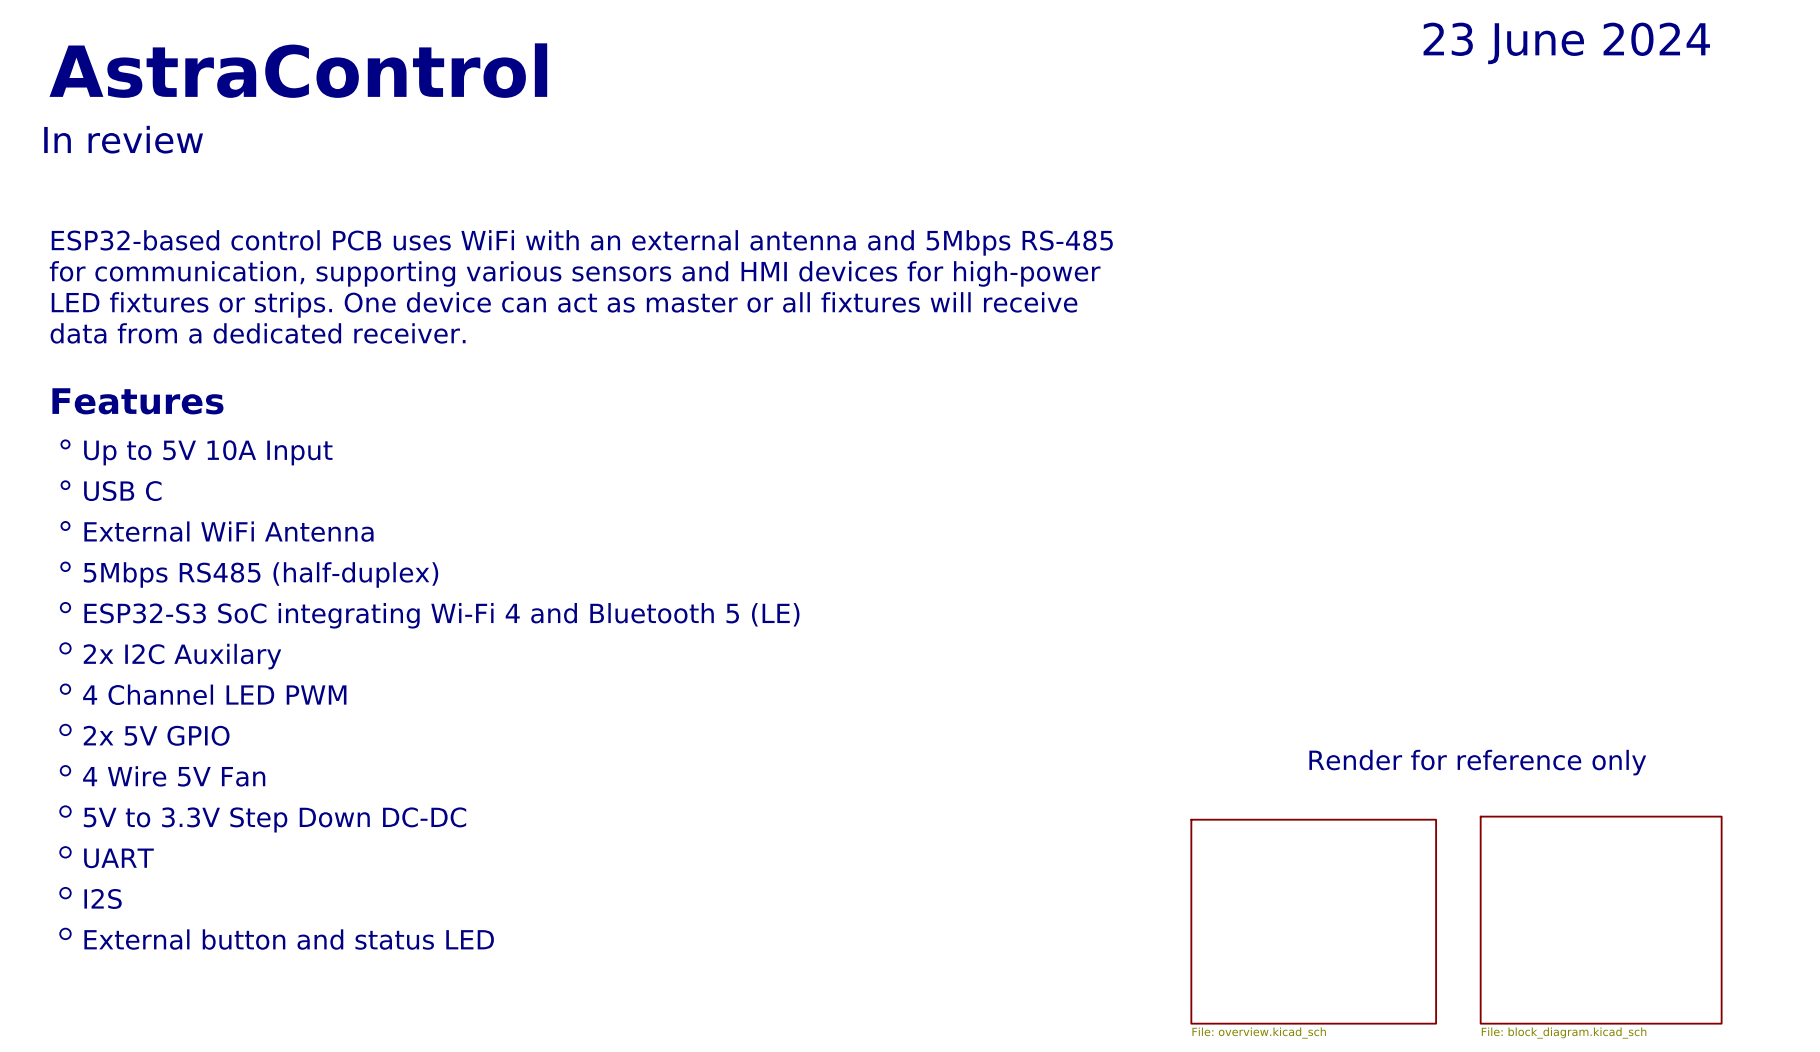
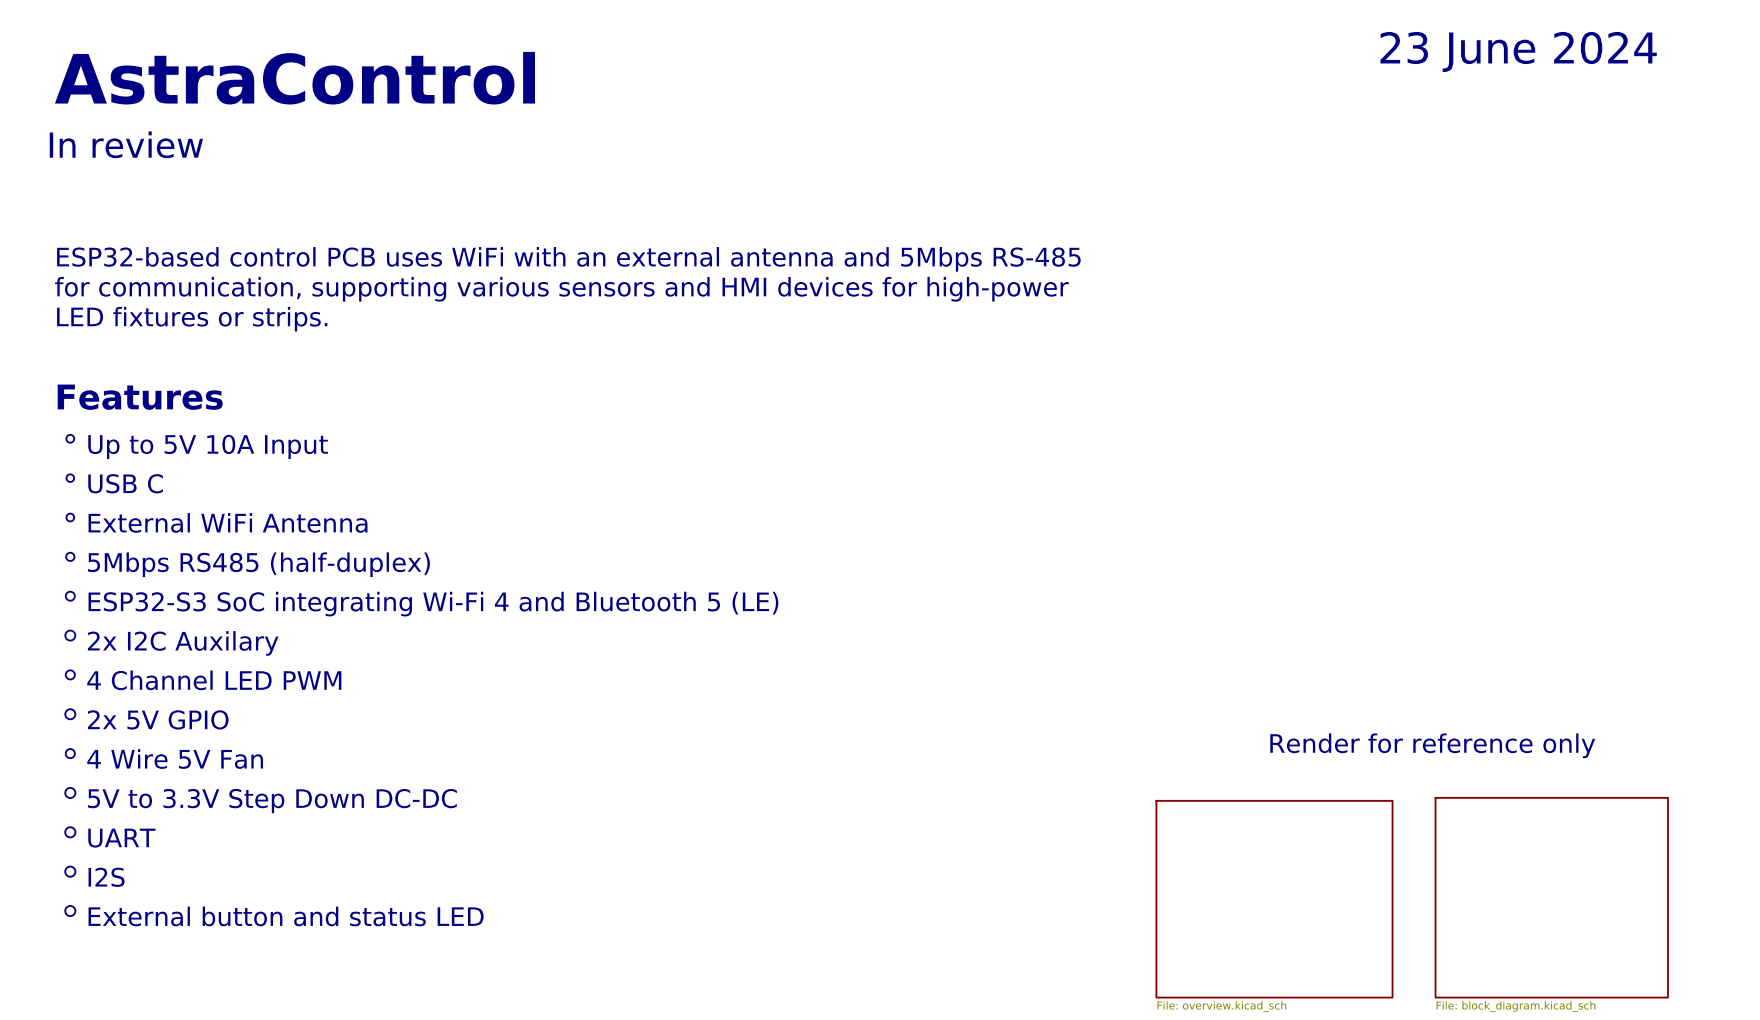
text position: ESP32-based control PCB uses WiFi with an external antenna and 5Mbps RS-485 (582, 242) -> ESP32-based control PCB uses WiFi with an external antenna and 5Mbps RS-485 (568, 259)
text position: for communication, supporting various sensors and HMI devices for high-power (575, 273) -> for communication, supporting various sensors and HMI devices for high-power (561, 289)
text: LED fixtures or strips. One device can act as master or all fixtures will receive (564, 304) -> none
text: none -> LED fixtures or strips. (192, 319)
text: data from a dedicated receiver. (258, 333) -> none

